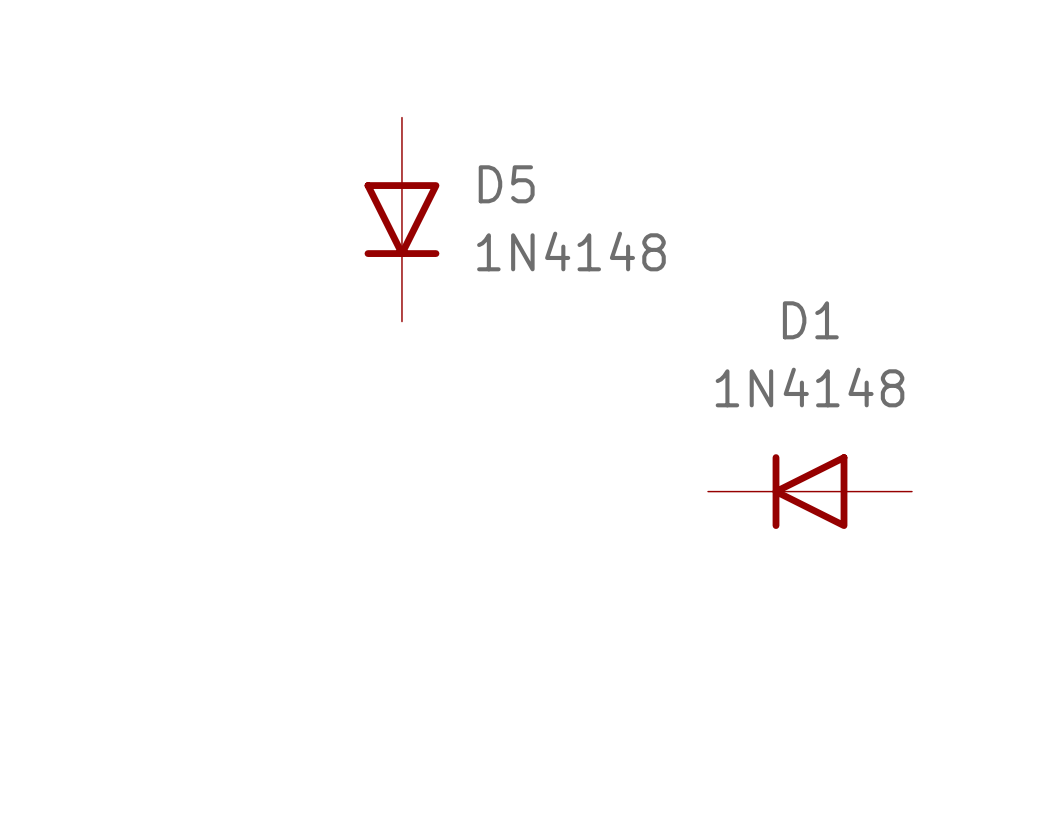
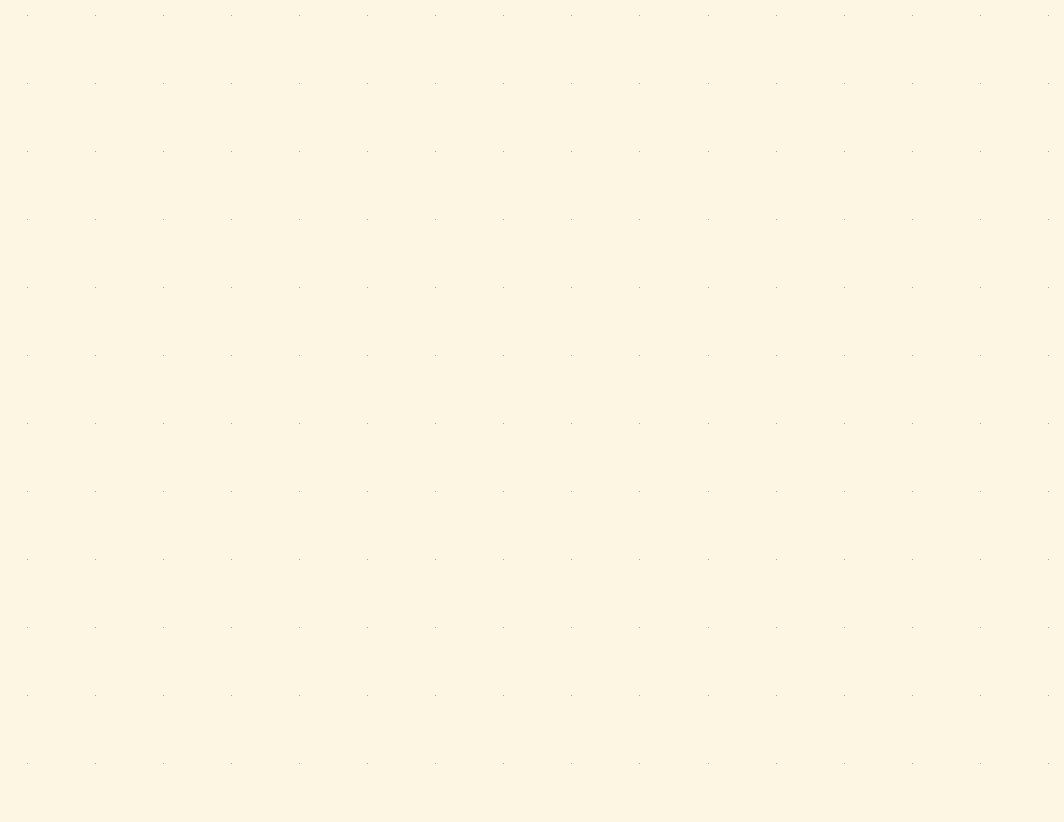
D5: 1N4148 (401, 219) -> none
D1: 1N4148 (810, 491) -> none

